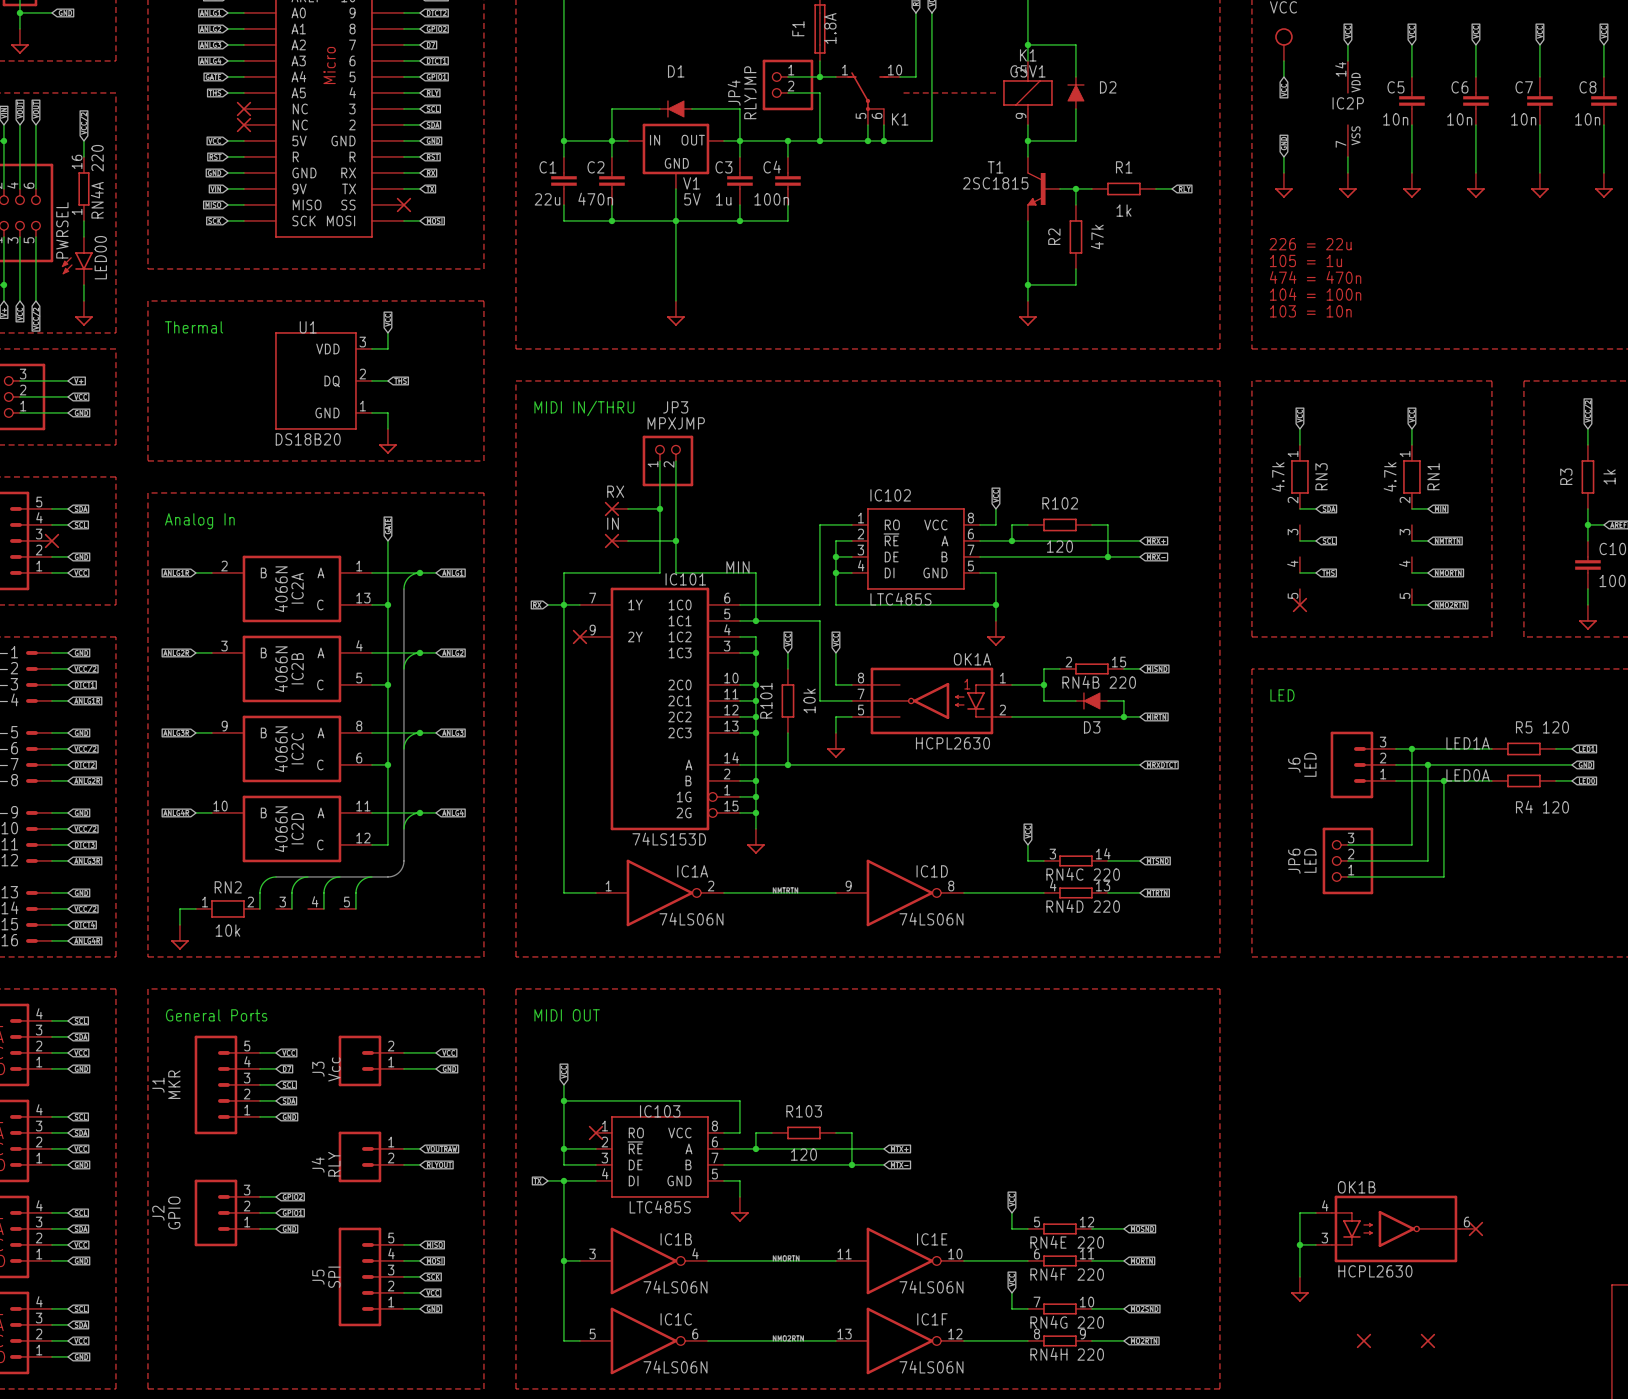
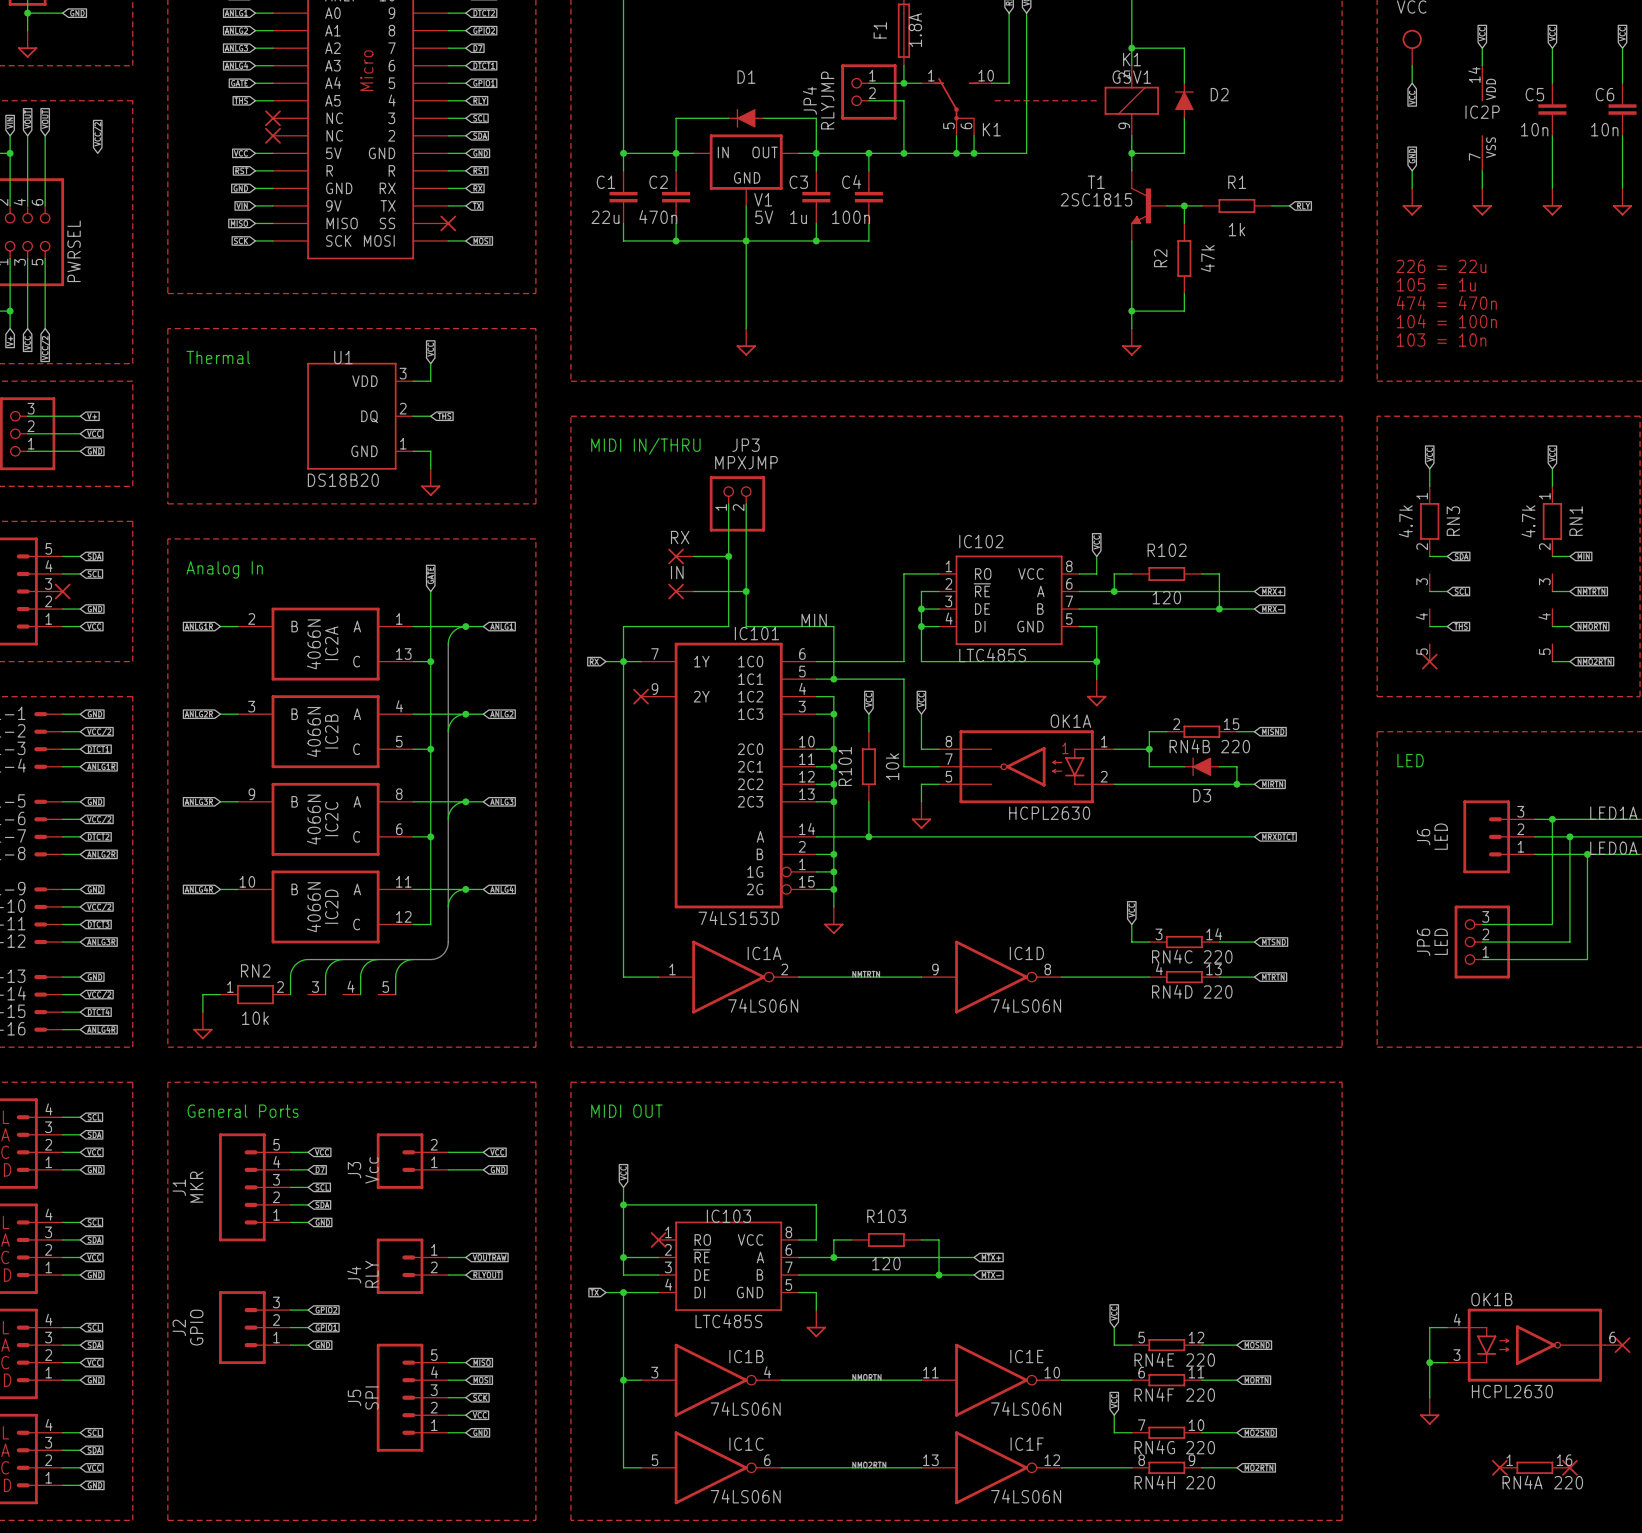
wire: (83, 140) (83, 156) -> none
RN4A rotation: 0° (83, 188) -> 90° clockwise (1534, 1467)
RN4A position: (83, 188) -> (1534, 1467)
wire: (83, 220) (83, 236) -> none
LED00: (77, 260) -> none
wire: (83, 284) (83, 300) -> none
power symbol: (83, 313) -> none

